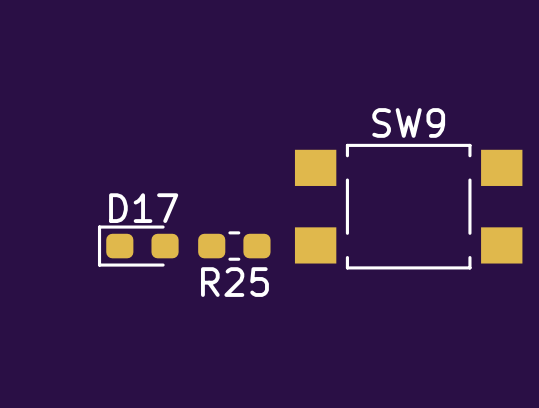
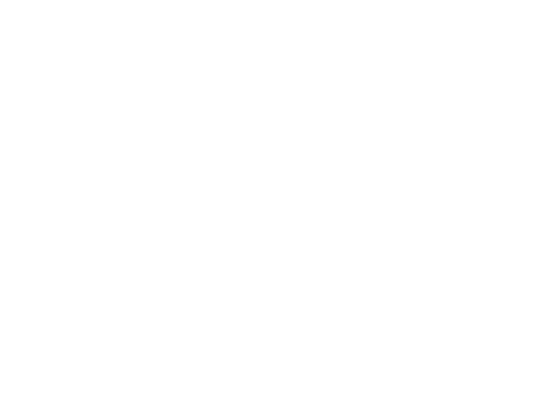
SW9: (408, 206) -> none
D17: (138, 246) -> none
R25: (234, 246) -> none

